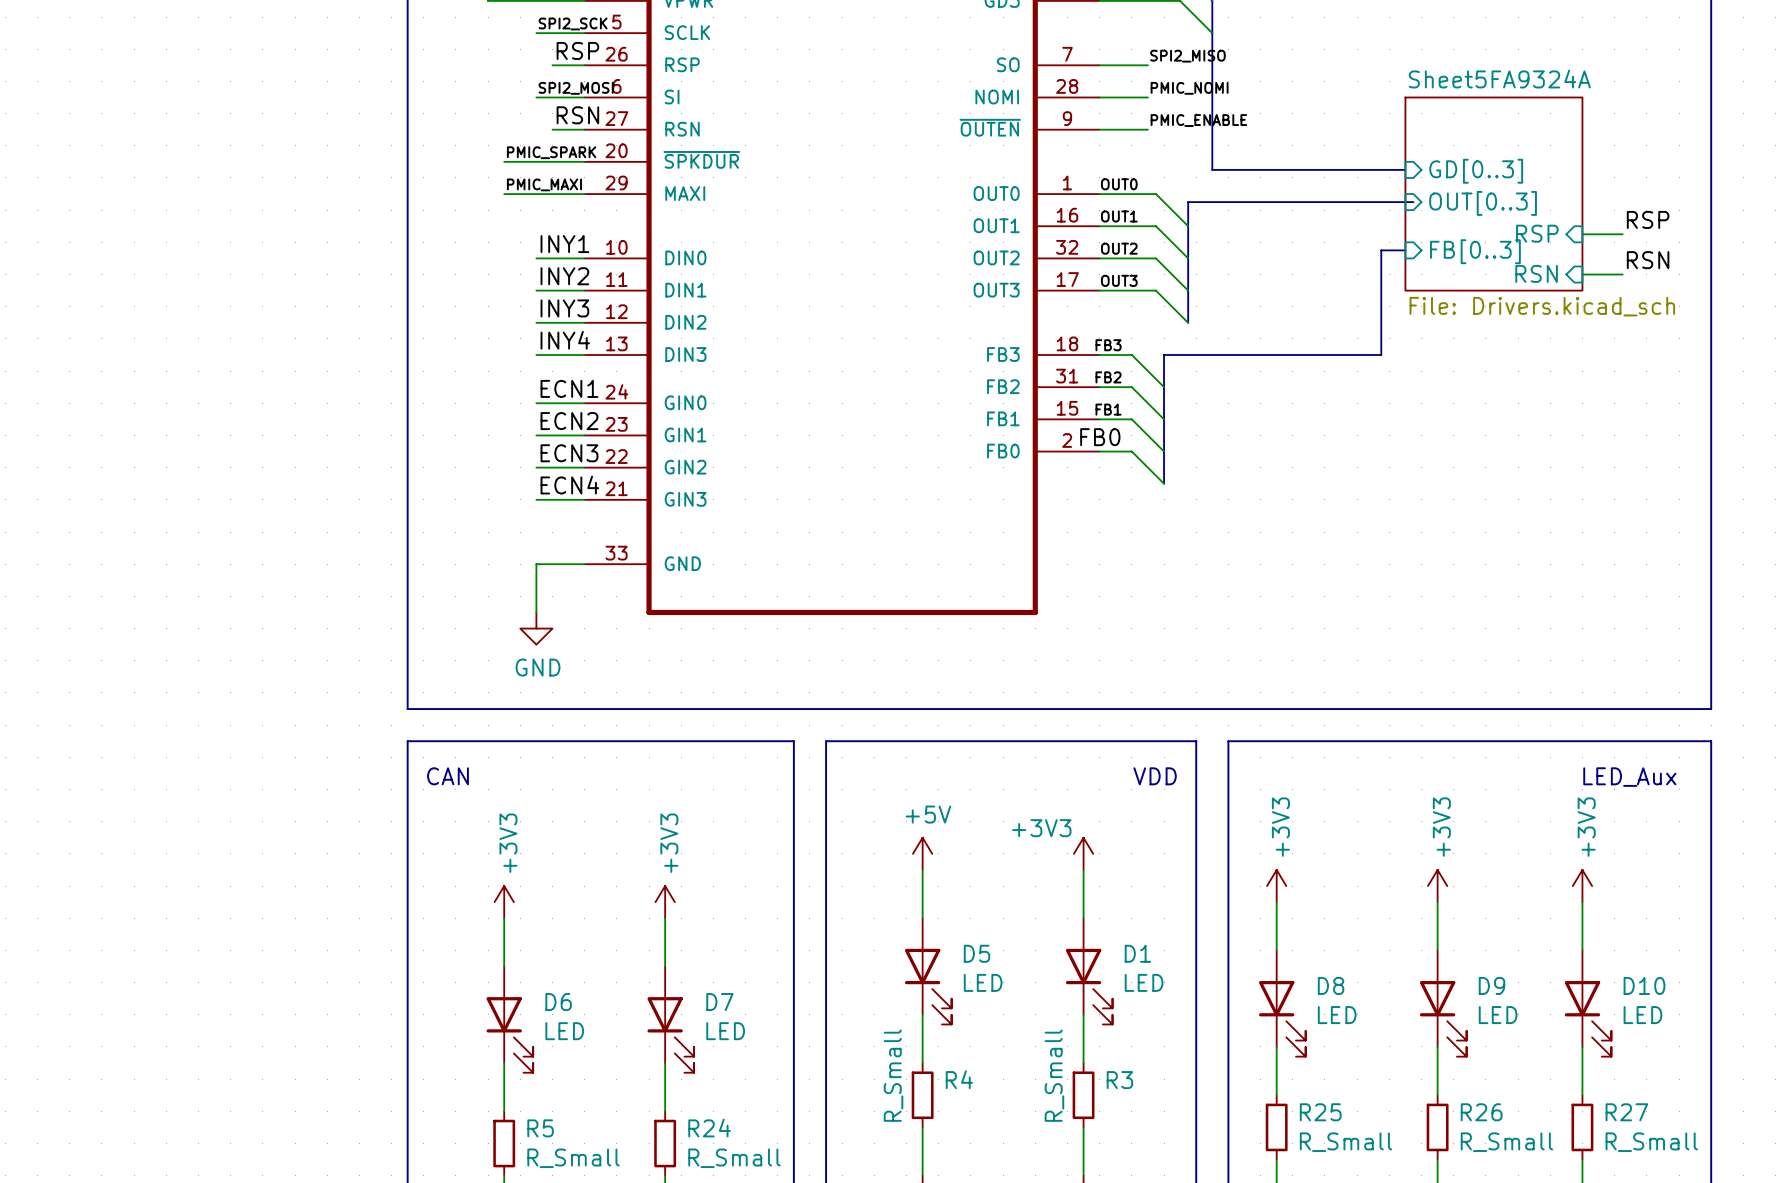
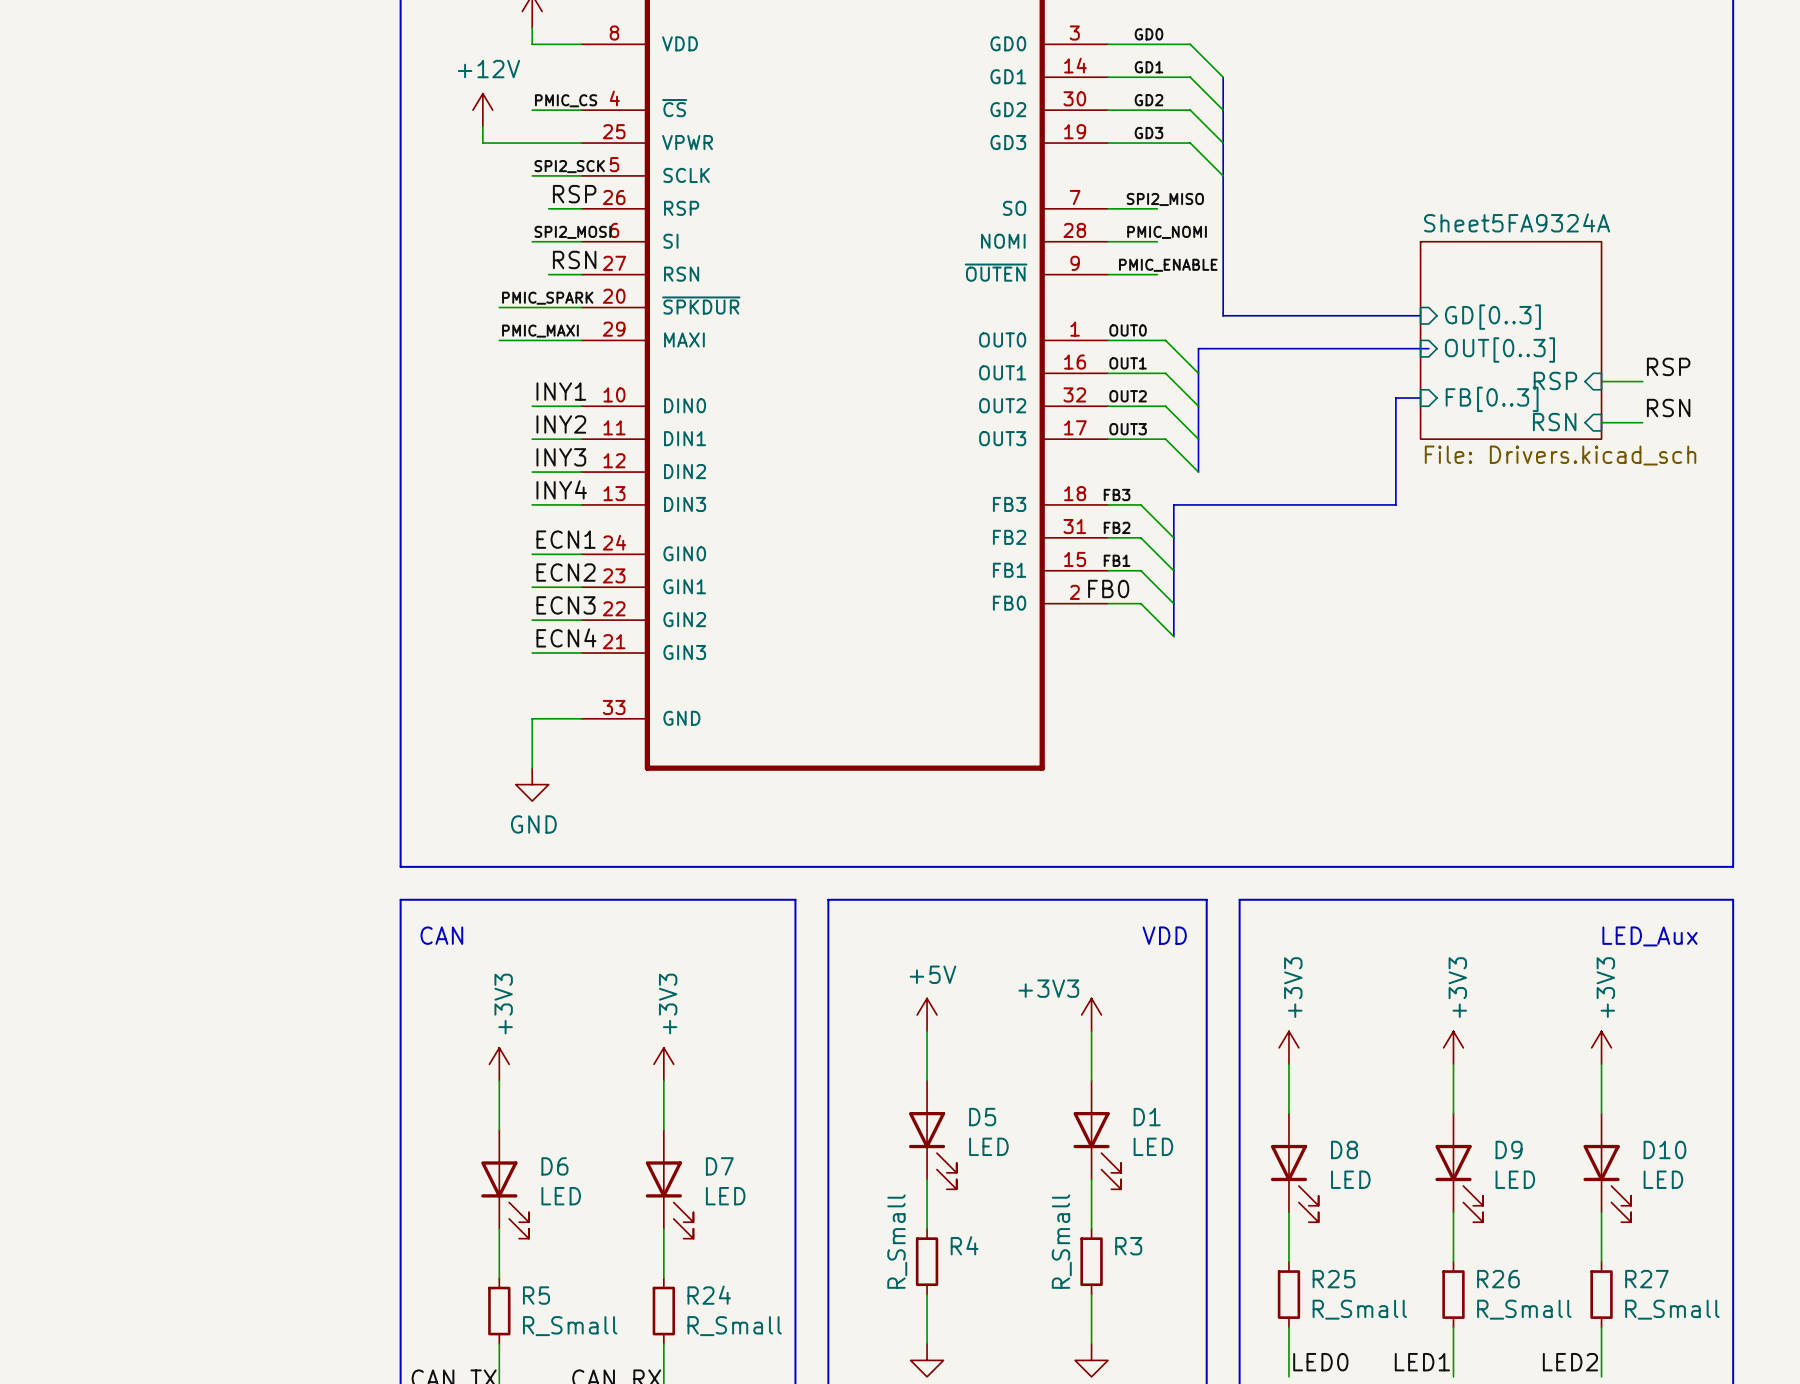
label position: SPI2_MISO (1187, 56) -> SPI2_MISO (1165, 199)
label position: PMIC_NOMI (1189, 88) -> PMIC_NOMI (1167, 232)
label position: PMIC_ENABLE (1198, 120) -> PMIC_ENABLE (1168, 265)

